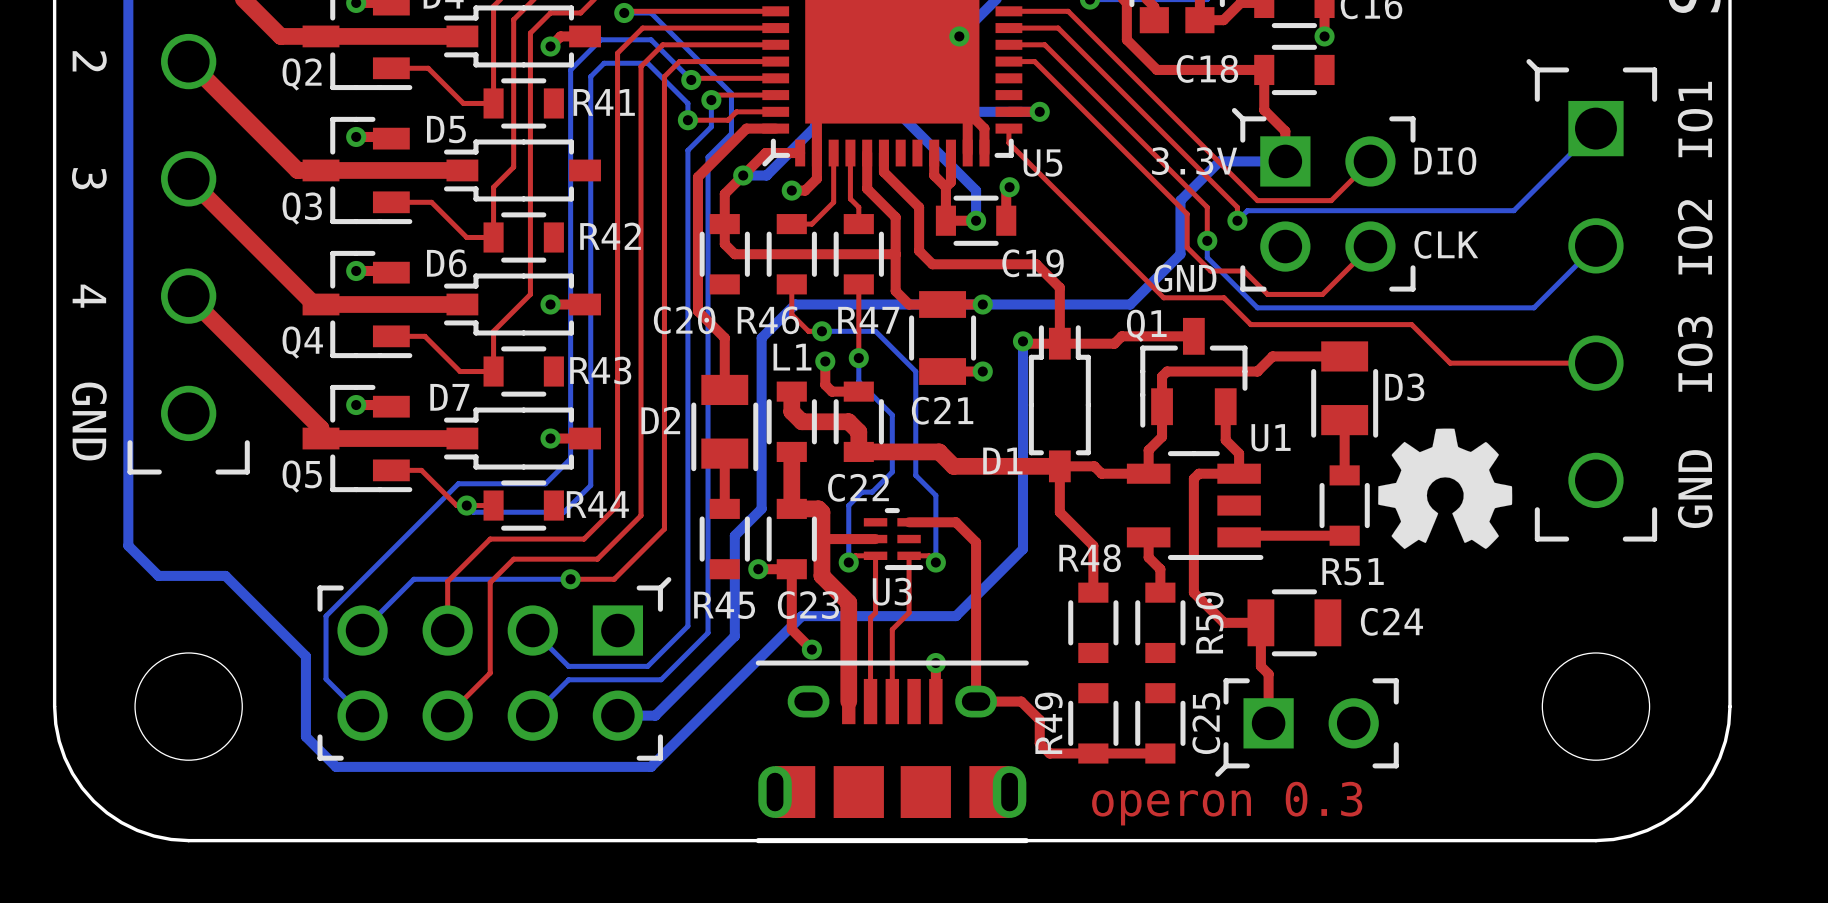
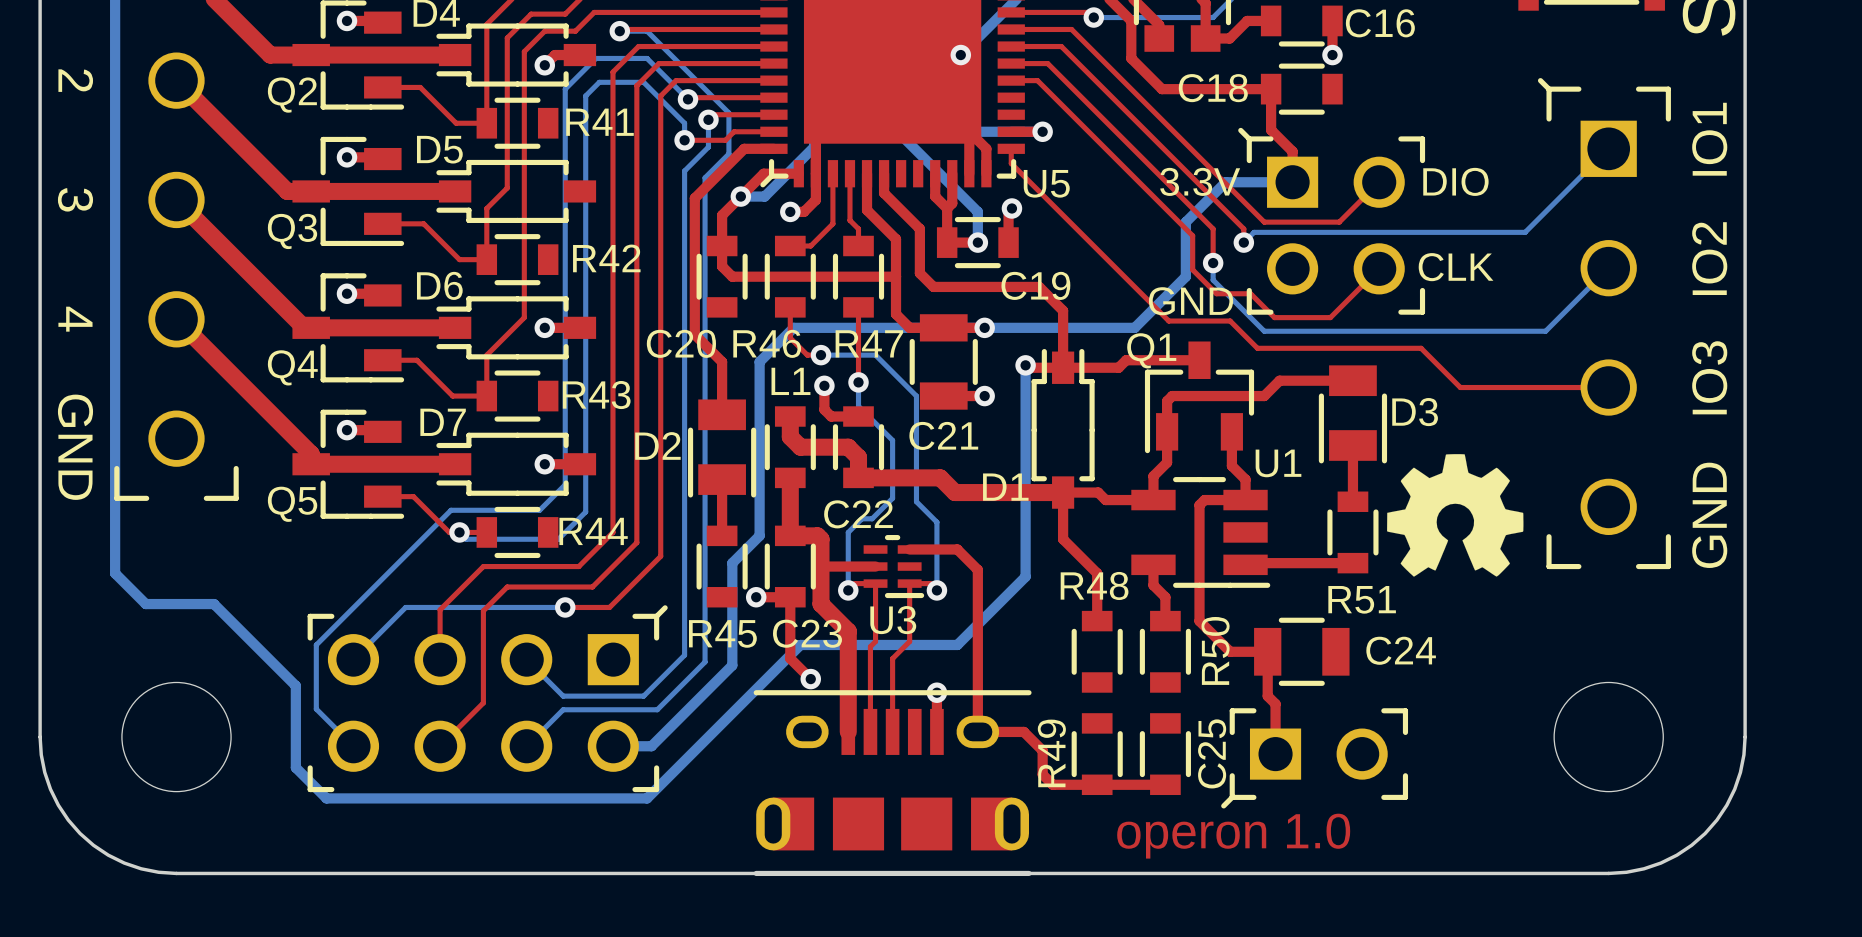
text: operon 0.3 (1227, 803) -> operon 1.0 (1233, 836)

